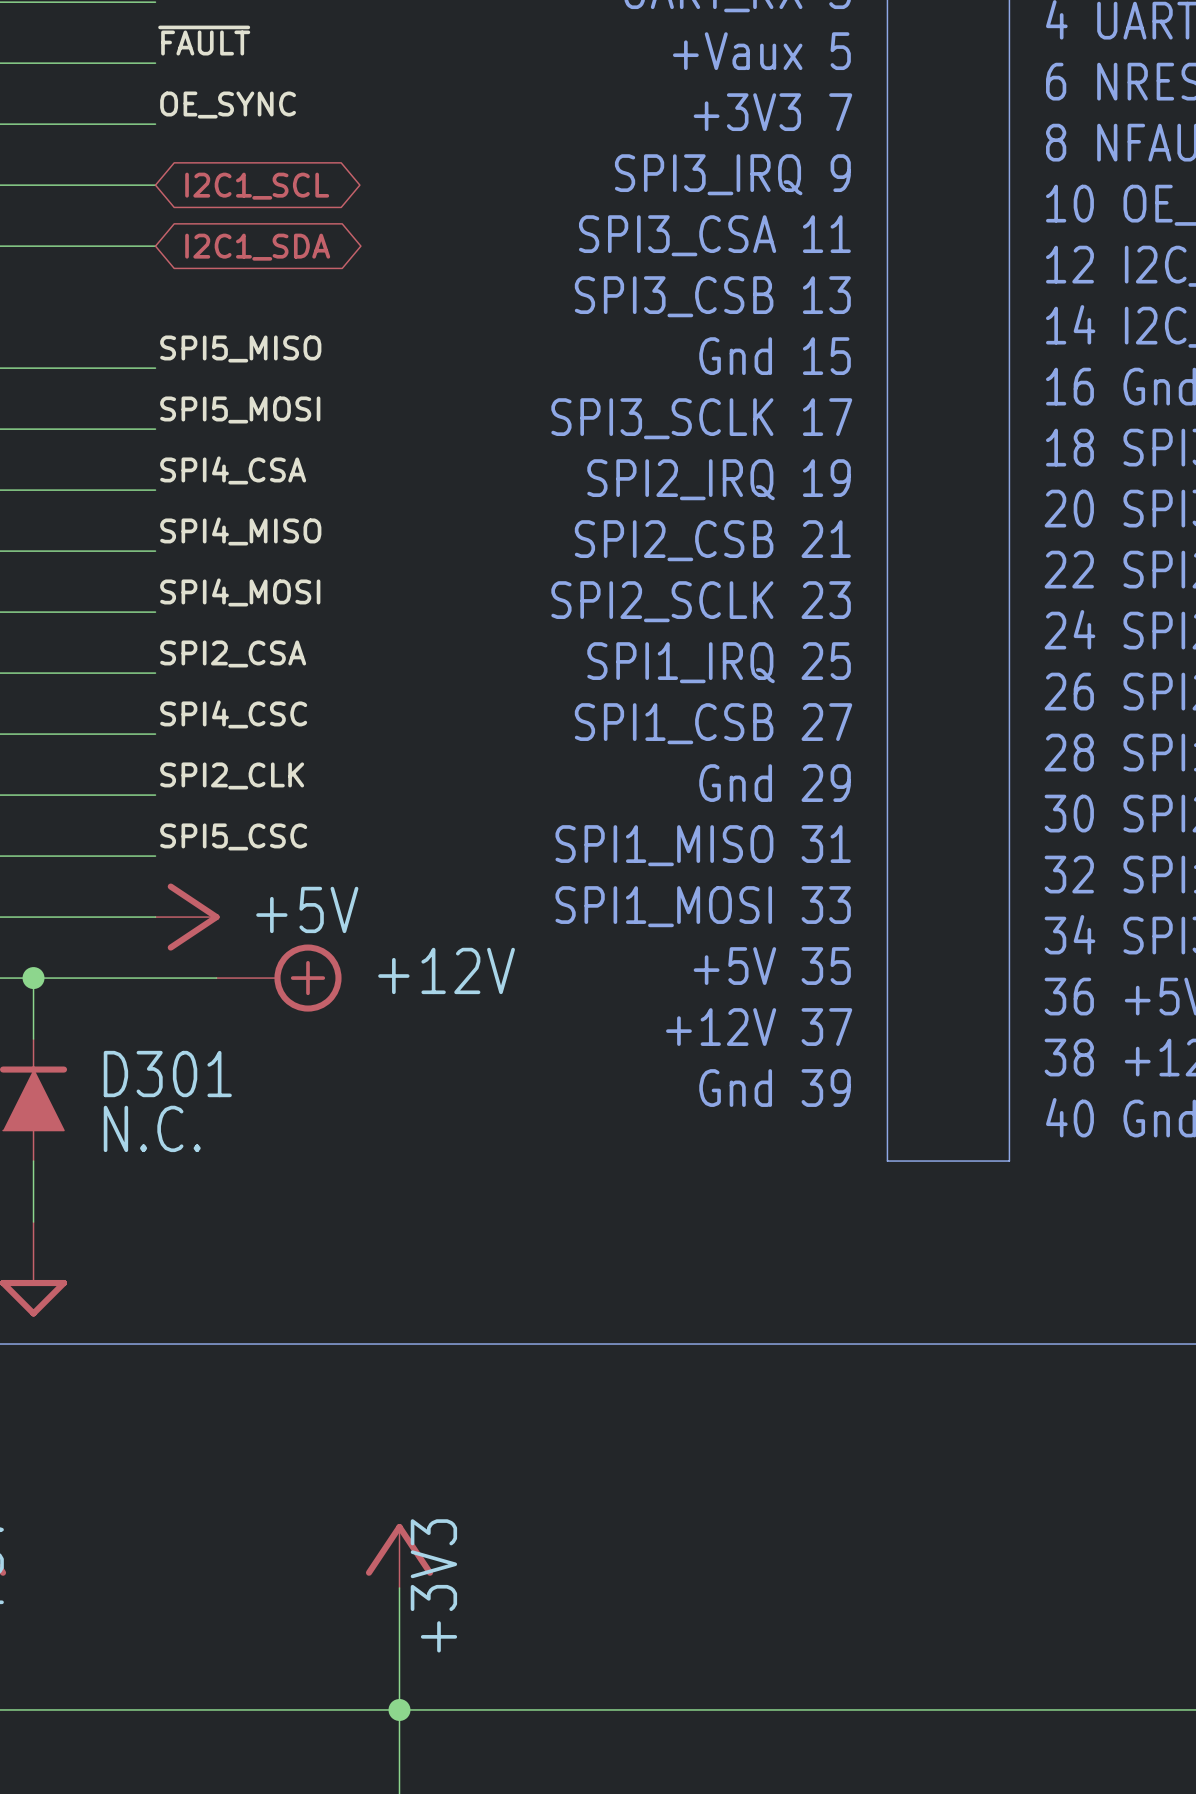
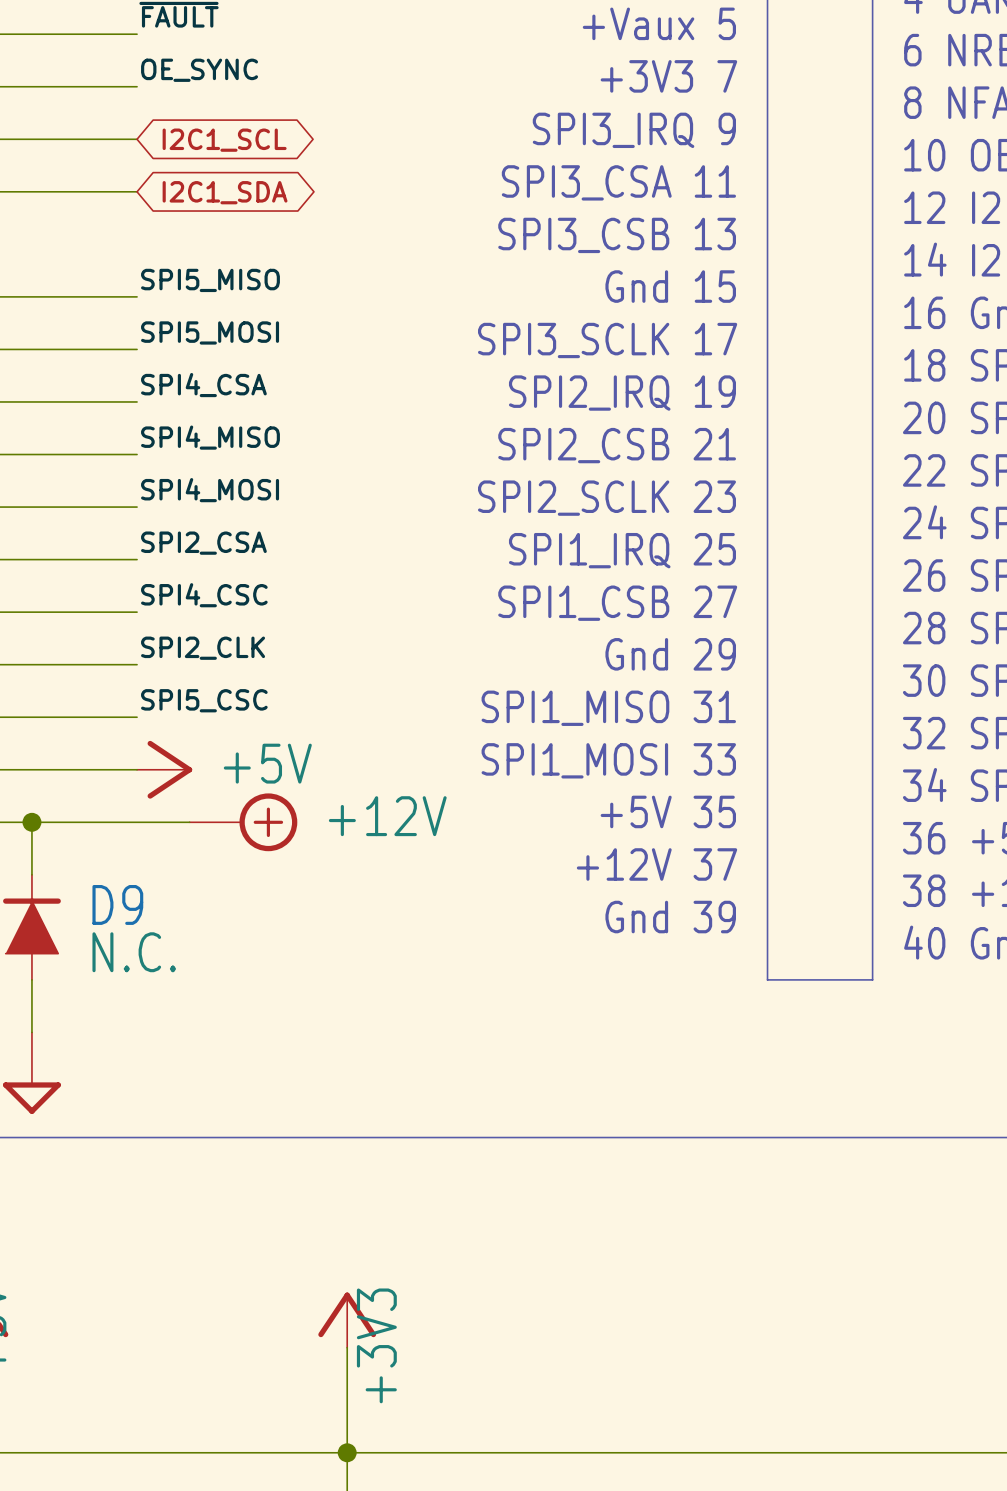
D301 name: D301 (167, 1074) -> D9 (117, 904)

